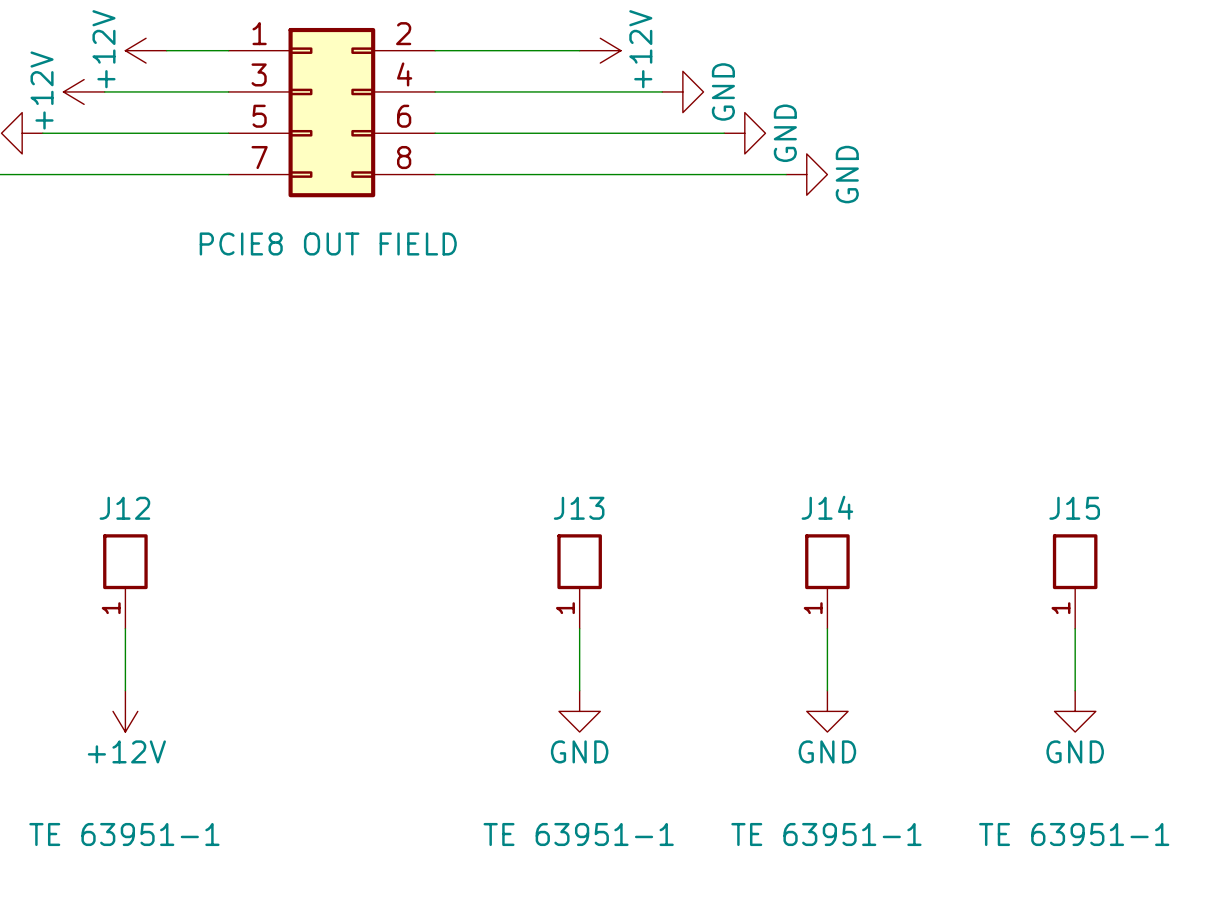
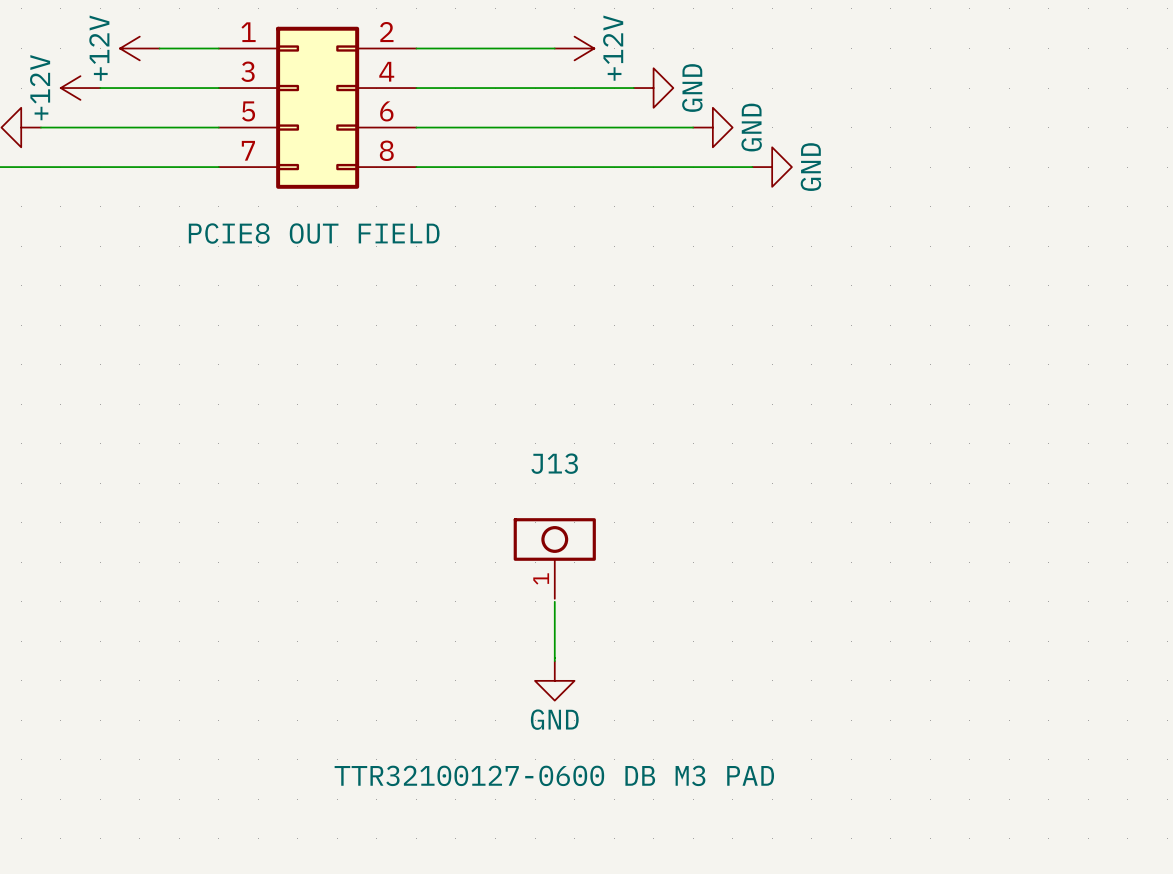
J13 symbol: [557, 534, 602, 629] -> [513, 518, 596, 599]
J12: TE 63951-1 (125, 581) -> none
J14: TE 63951-1 (827, 581) -> none
J15: TE 63951-1 (1075, 581) -> none
wire: (125, 628) (125, 690) -> none
wire: (827, 628) (827, 690) -> none
wire: (1075, 628) (1075, 690) -> none
power symbol: +12V (125, 711) -> none
power symbol: GND (827, 711) -> none
power symbol: GND (1075, 711) -> none
J13 value: TE 63951-1 (578, 834) -> TTR32100127-0600 DB M3 PAD (554, 775)

